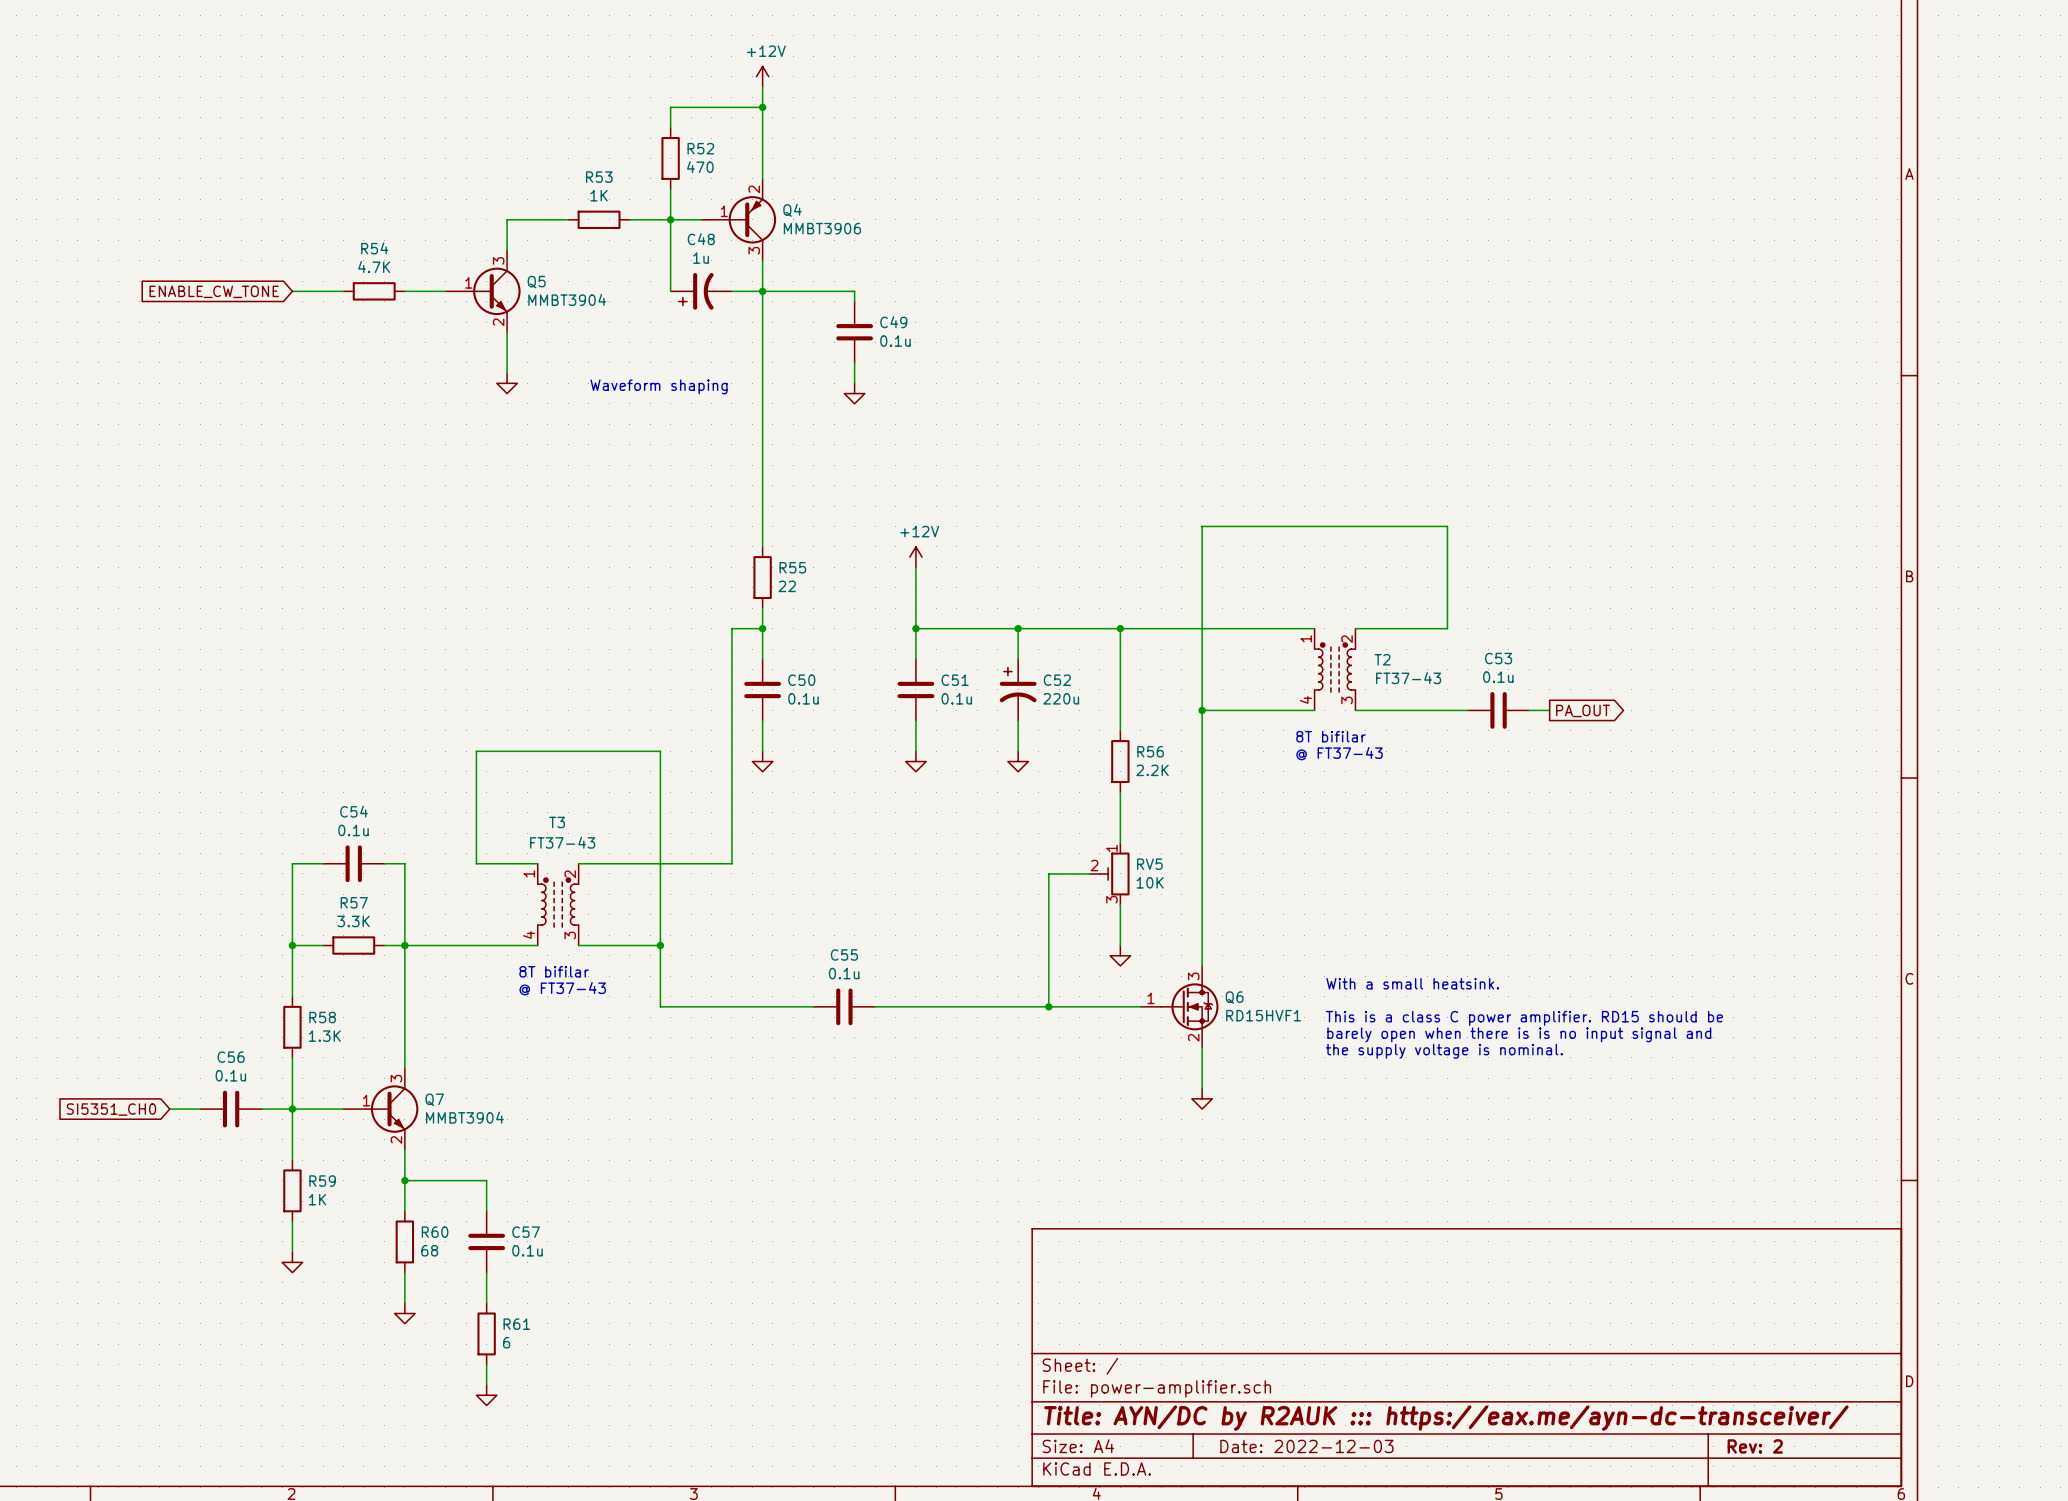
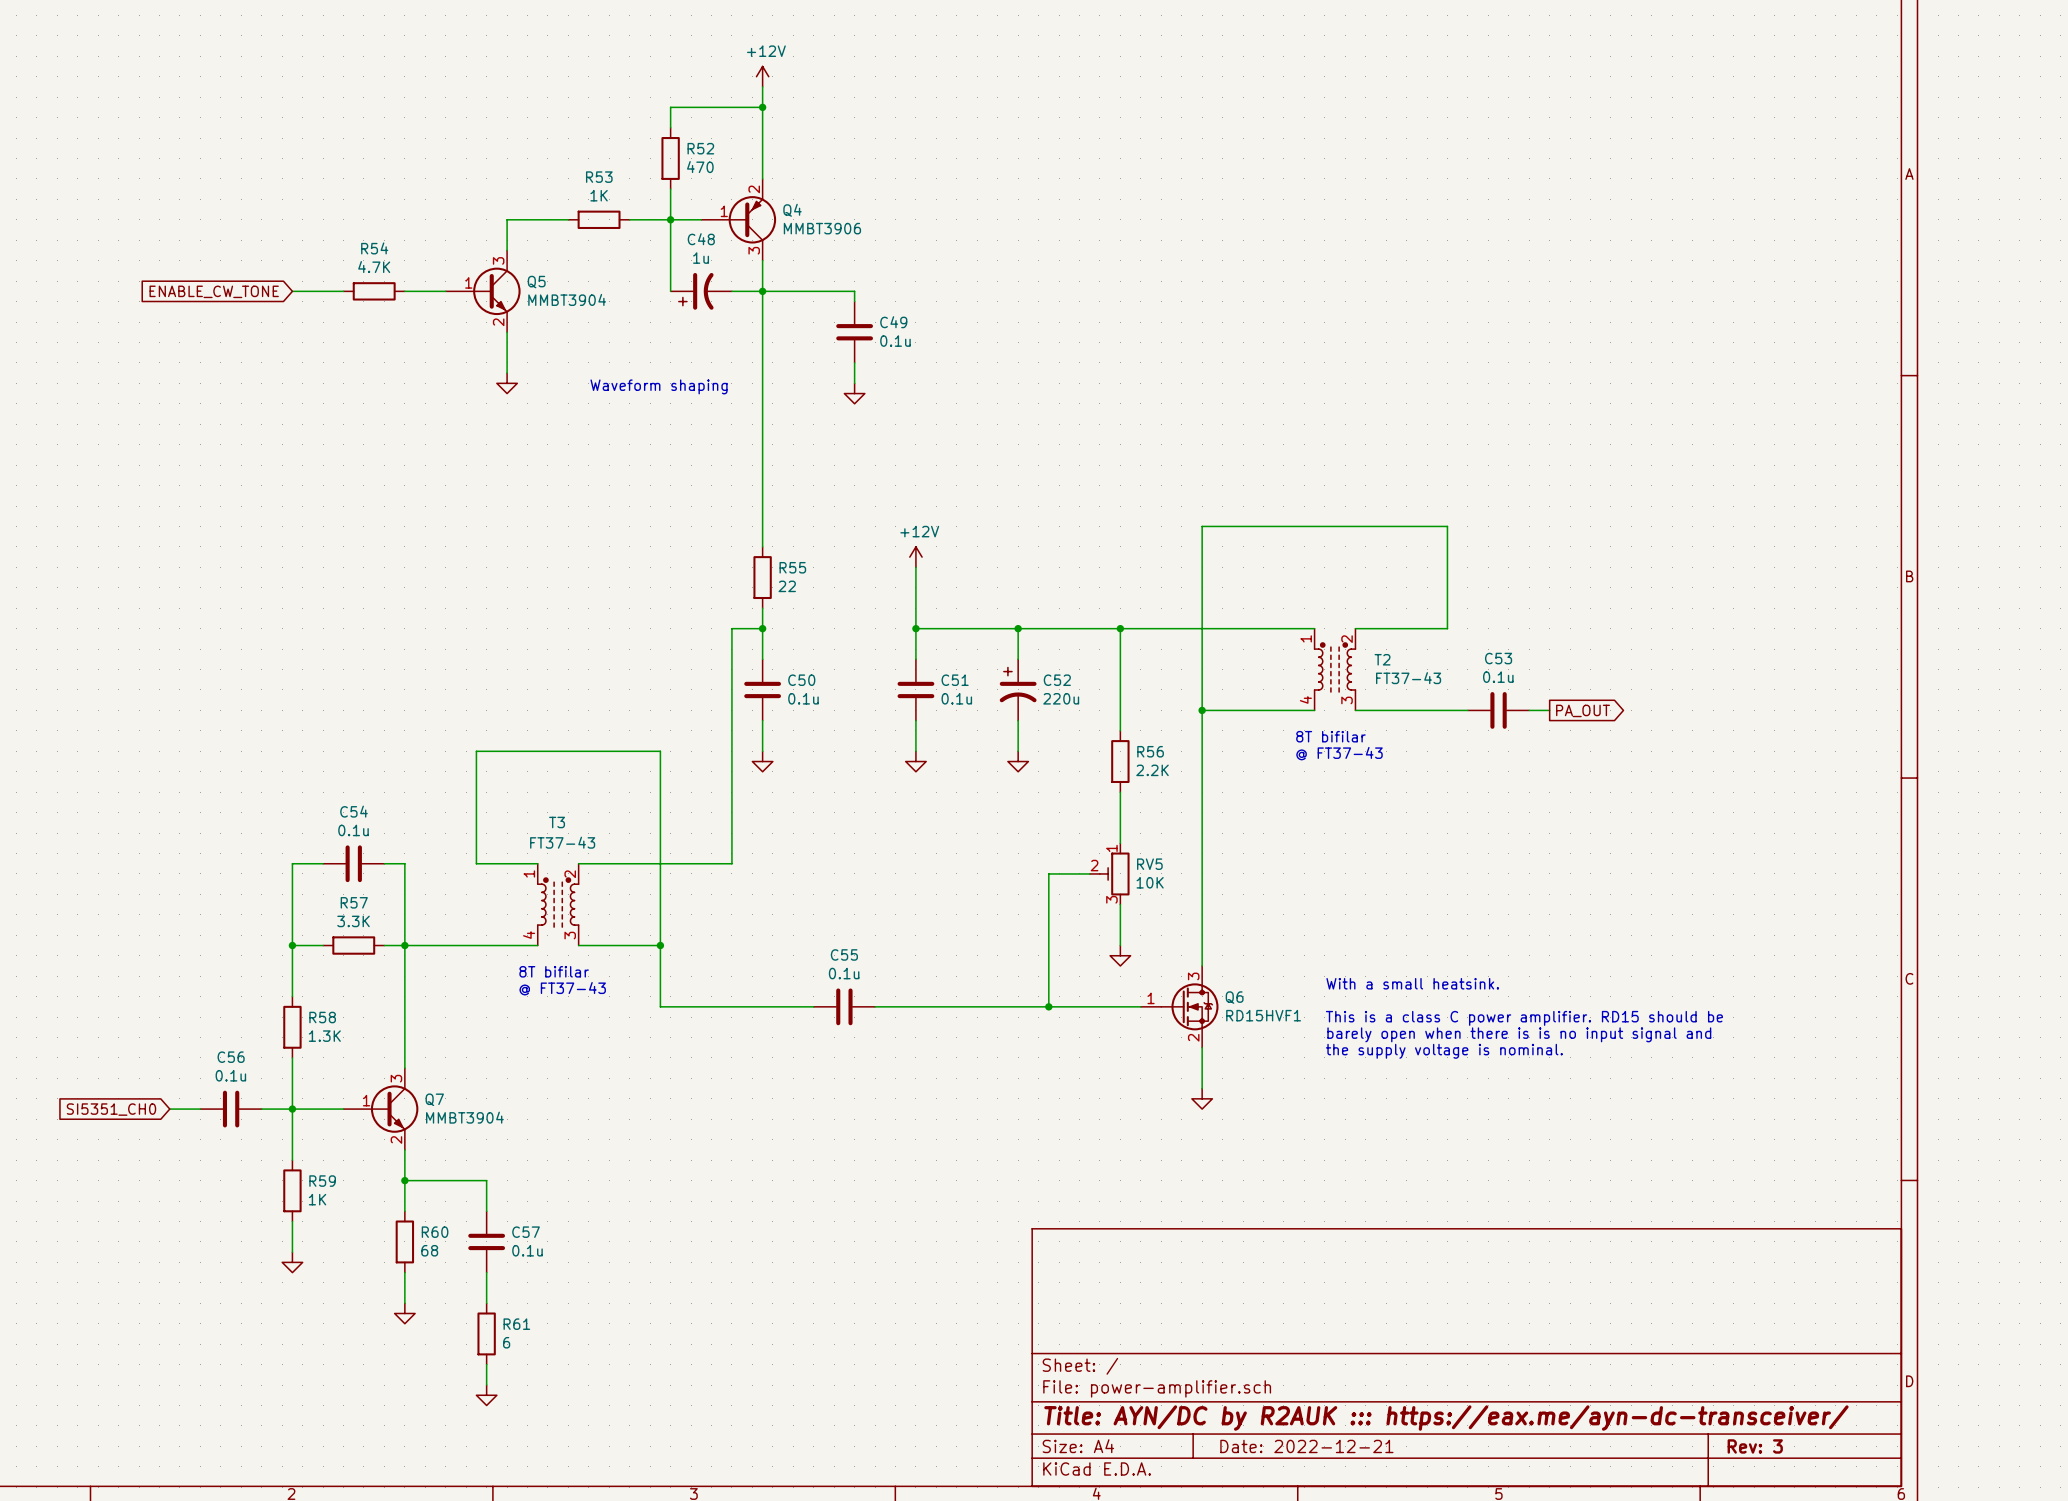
title block: Date: 2022-12-03 (1306, 1446) -> Date: 2022-12-21 (1306, 1446)
title block: Rev: 2 (1755, 1446) -> Rev: 3 (1755, 1446)

